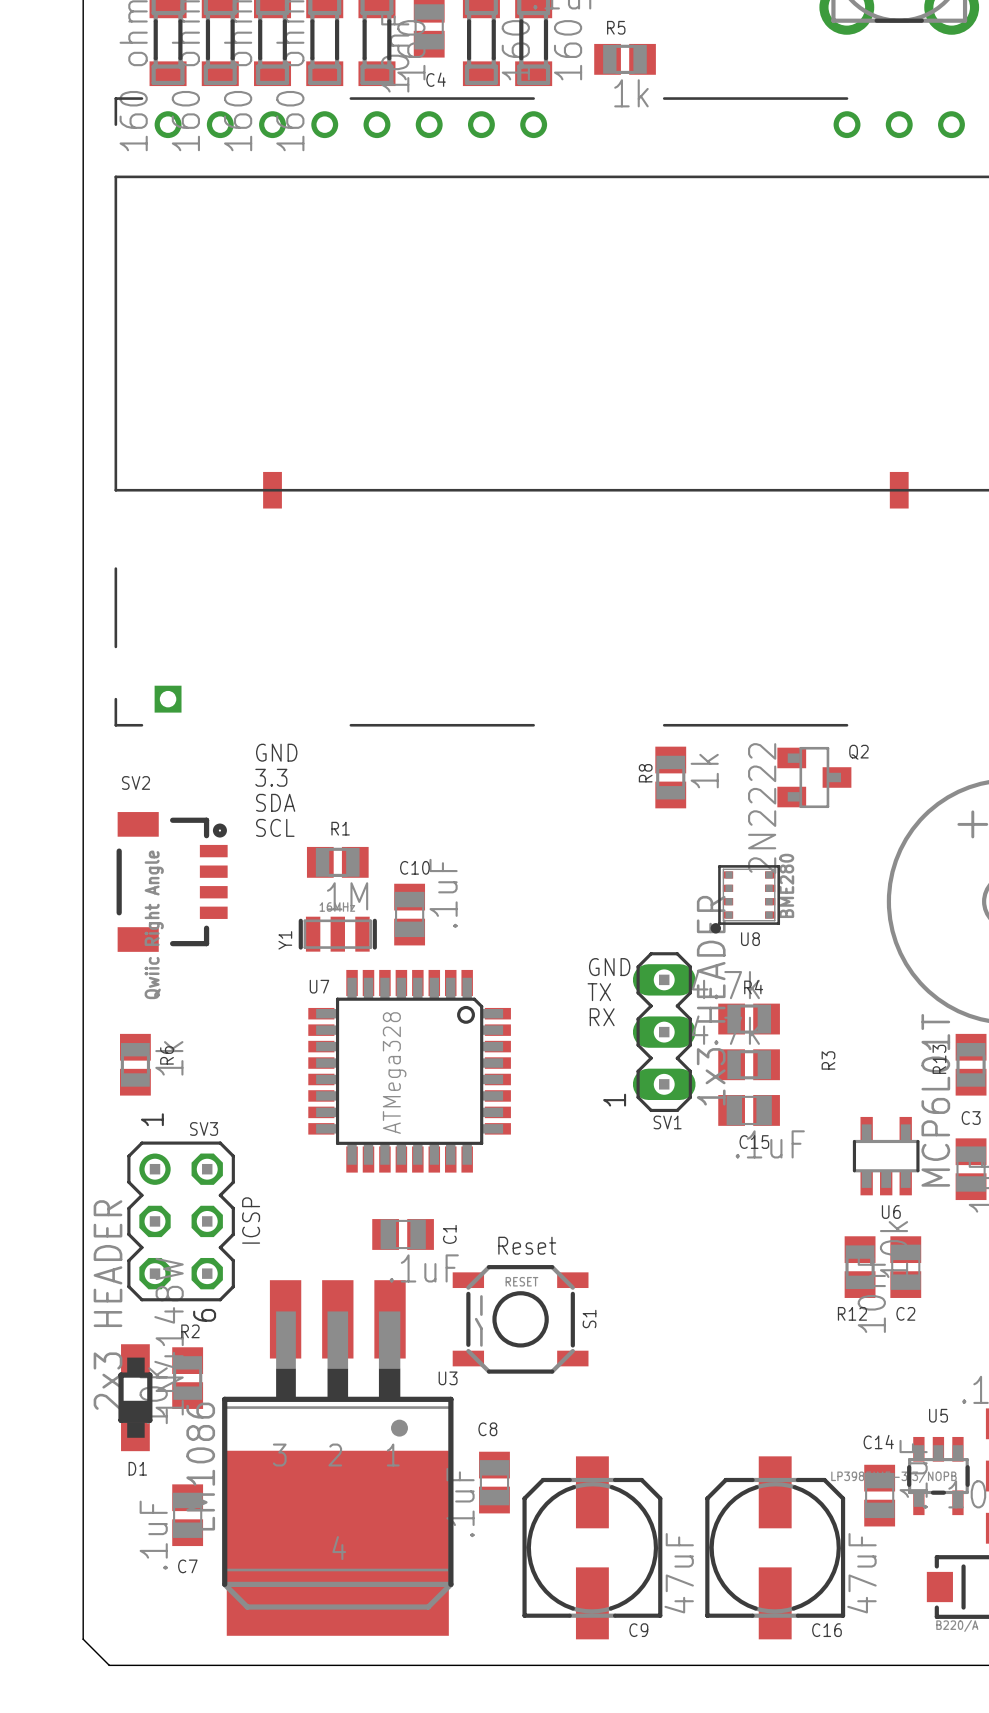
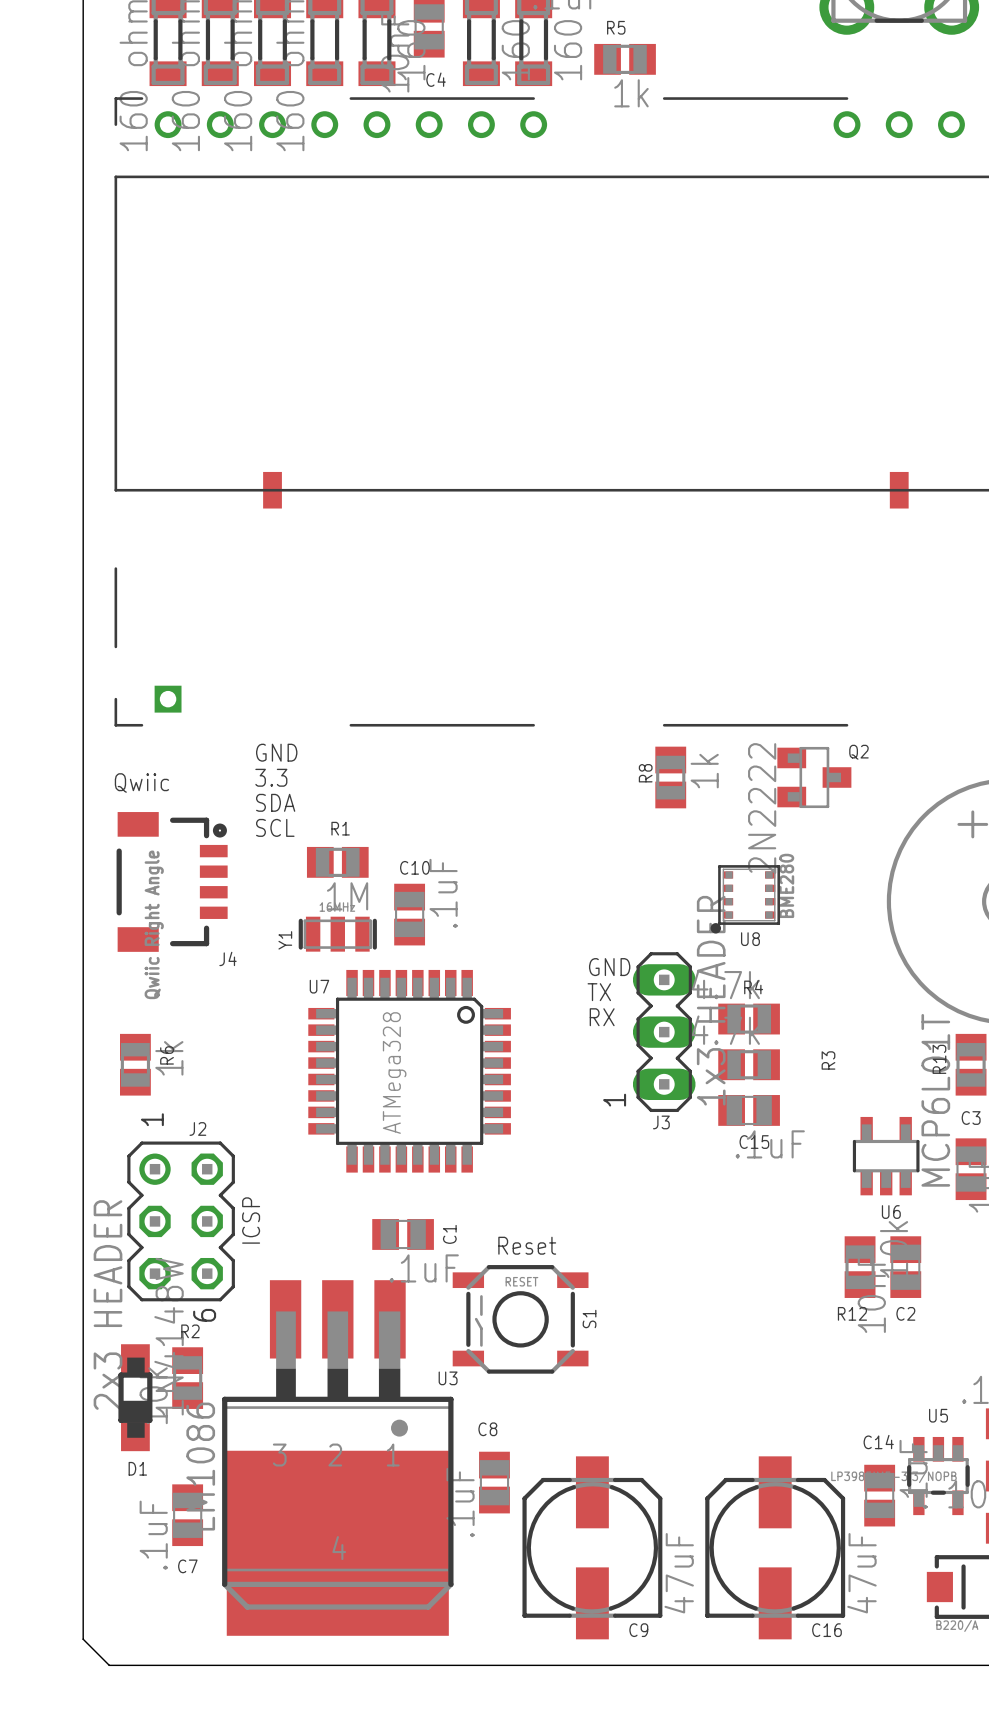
SV2 name: SV2 (135, 782) -> J4 (228, 958)
text: none -> Qwiic (141, 782)
SV1 name: SV1 (667, 1122) -> J3 (661, 1122)
SV3 name: SV3 (204, 1128) -> J2 (197, 1128)

